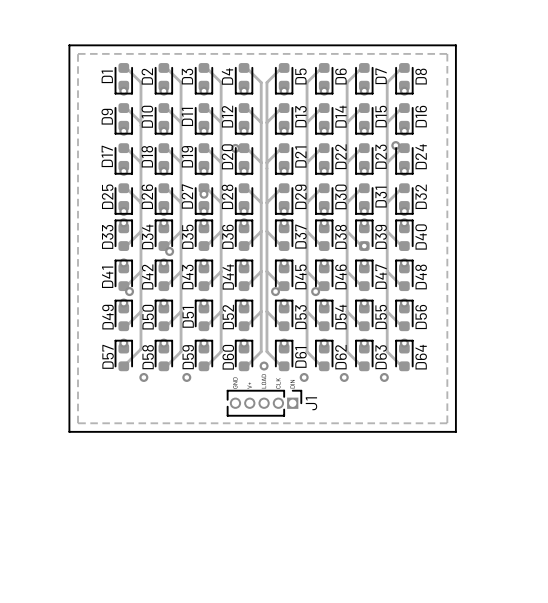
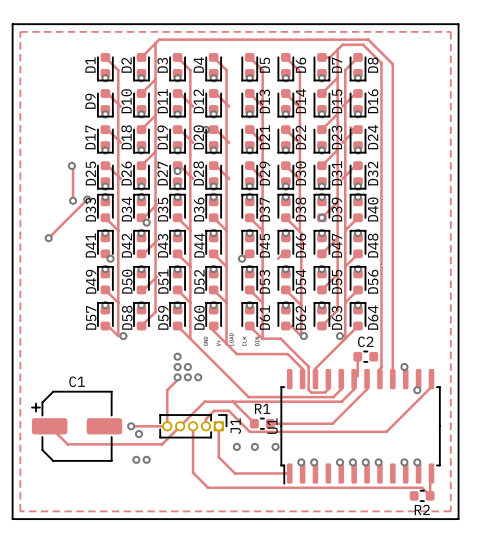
board edge: (69, 45) (69, 431) (455, 431) (455, 45) (69, 45) -> (12, 24) (12, 519) (458, 519) (458, 24) (12, 24)
zone outline: (77, 53) (77, 423) (447, 423) (447, 53) (77, 53) -> (20, 31) (20, 511) (450, 511) (450, 31) (20, 31)
track: (123, 67) (126, 67) (140, 82) (140, 349) (123, 366) -> (105, 57) (118, 70) (118, 336) (108, 326) (105, 326) (107, 328)
track: (163, 67) (166, 67) (181, 82) (181, 351) (166, 366) (163, 366) -> (155, 43) (155, 311) (141, 326)
track: none -> (141, 57) (159, 39) (368, 39) (392, 64) (392, 379)
track: (203, 67) (206, 67) (221, 82) (221, 351) (206, 366) (203, 366) -> (177, 57) (190, 70) (190, 338)
track: (244, 67) (246, 67) (261, 82) (261, 351) (246, 366) (244, 366) -> (213, 57) (226, 70) (226, 343)
track: (284, 67) (281, 67) (266, 82) (266, 351) (281, 366) (284, 366) -> (249, 57) (262, 70) (262, 338)
track: (324, 67) (321, 67) (307, 82) (307, 351) (321, 366) (324, 366) -> (285, 57) (299, 71) (299, 231)
track: (364, 67) (361, 67) (347, 82) (347, 351) (361, 366) (364, 366) -> (337, 49) (337, 310) (321, 326)
track: none -> (321, 57) (329, 57) (342, 44) (363, 44) (381, 63) (379, 379)
track: (404, 67) (401, 67) (387, 82) (387, 351) (401, 366) (404, 366) -> (358, 57) (345, 70) (345, 338)
track: (163, 108) (166, 108) (181, 122) -> (141, 93) (155, 79)
track: (284, 108) (281, 108) (266, 122) -> (249, 93) (262, 106)
track: (324, 108) (321, 108) (307, 122) -> (285, 93) (299, 107)
track: (364, 108) (361, 108) (347, 122) -> (321, 93) (337, 77)
via: (395, 145) -> none
track: (163, 148) (166, 148) (181, 162) -> (141, 129) (155, 115)
track: (284, 148) (281, 148) (266, 162) -> (249, 129) (262, 142)
track: (324, 148) (321, 148) (307, 162) -> (285, 129) (299, 143)
track: (364, 148) (361, 148) (347, 162) -> (321, 129) (337, 113)
track: none -> (71, 165) (73, 200)
via: none -> (71, 165)
track: (163, 188) (166, 188) (181, 202) -> (141, 165) (155, 151)
track: (284, 188) (281, 188) (266, 202) -> (249, 165) (262, 178)
track: (324, 188) (321, 188) (307, 202) -> (285, 165) (299, 179)
track: (364, 188) (361, 188) (347, 202) -> (321, 165) (337, 149)
track: none -> (87, 199) (48, 238)
via: none -> (87, 199)
via: none -> (73, 200)
track: (140, 231) (126, 246) (123, 246) -> (118, 230) (105, 217)
track: (221, 231) (206, 246) (203, 246) -> (190, 230) (177, 217)
track: (261, 231) (246, 246) (244, 246) -> (226, 230) (213, 217)
track: (266, 231) (281, 246) (284, 246) -> (262, 230) (249, 217)
track: (307, 231) (321, 246) (324, 246) -> (285, 326) (291, 326) (301, 336) (301, 233) (285, 217)
track: (347, 231) (361, 246) (364, 246) -> (337, 202) (321, 217)
track: (387, 231) (401, 246) (404, 246) -> (345, 230) (358, 217)
via: none -> (48, 238)
track: (140, 271) (126, 286) (123, 286) -> none
track: (221, 271) (206, 286) (203, 286) -> (190, 266) (177, 253)
track: (261, 271) (246, 286) (244, 286) -> (226, 266) (213, 253)
track: (266, 271) (281, 286) -> none
track: (307, 271) (321, 286) -> none
track: (347, 271) (361, 286) (364, 286) -> (337, 238) (321, 253)
track: (387, 271) (401, 286) (404, 286) -> (345, 266) (358, 253)
via: (315, 291) -> none
track: (140, 311) (126, 326) (123, 326) -> (118, 302) (105, 289)
track: (221, 311) (206, 326) (203, 326) -> (190, 302) (177, 289)
track: (261, 311) (246, 326) (244, 326) -> (226, 302) (213, 289)
track: (266, 311) (281, 326) (284, 326) -> (262, 302) (249, 289)
track: (307, 311) (321, 326) -> none
track: (347, 311) (361, 326) (364, 326) -> (337, 274) (321, 289)
track: (387, 311) (401, 326) (404, 326) -> (345, 302) (358, 289)
track: none -> (285, 289) (301, 305)
track: none -> (177, 326) (248, 397) (333, 397) (341, 389) (341, 379)
track: none -> (213, 326) (213, 330) (236, 354) (287, 354) (302, 368) (302, 379)
via: (264, 366) -> none
track: none -> (249, 326) (262, 338)
track: none -> (358, 326) (315, 368) (315, 379)
via: (186, 377) -> none
via: (304, 377) -> none
track: none -> (262, 338) (280, 338) (308, 366) (308, 389) (311, 392) (325, 392) (328, 389) (328, 379)
via: none -> (177, 356)
track: none -> (357, 356) (357, 375) (354, 379) (354, 389) (341, 401) (204, 401) (162, 444) (67, 444) (49, 426)
C2: none -> (365, 356)
J1 position: (264, 403) -> (193, 426)
via: none -> (177, 367)
via: none -> (187, 367)
via: none -> (404, 367)
via: none -> (177, 377)
via: none -> (187, 377)
via: none -> (198, 377)
track: none -> (367, 379) (367, 389) (332, 423) (270, 423)
track: none -> (431, 379) (431, 386) (386, 431) (249, 431) (228, 410) (214, 410) (205, 419) (205, 426)
track: none -> (177, 379) (167, 390) (167, 426) (131, 426)
via: none -> (417, 390)
track: none -> (232, 401) (254, 423)
R1: none -> (262, 423)
C1: none -> (76, 426)
via: none -> (131, 426)
track: none -> (193, 426) (193, 472) (208, 487) (422, 487) (430, 495) (431, 473)
track: none -> (218, 426) (218, 457) (235, 473) (289, 473)
U1: none -> (360, 426)
via: none -> (138, 434)
via: none -> (236, 446)
via: none -> (254, 446)
via: none -> (275, 446)
via: none -> (136, 459)
via: none -> (146, 459)
via: none -> (301, 462)
via: none -> (314, 462)
via: none -> (339, 462)
via: none -> (352, 462)
via: none -> (365, 462)
via: none -> (378, 462)
via: none -> (404, 462)
via: none -> (417, 462)
R2: none -> (422, 495)

